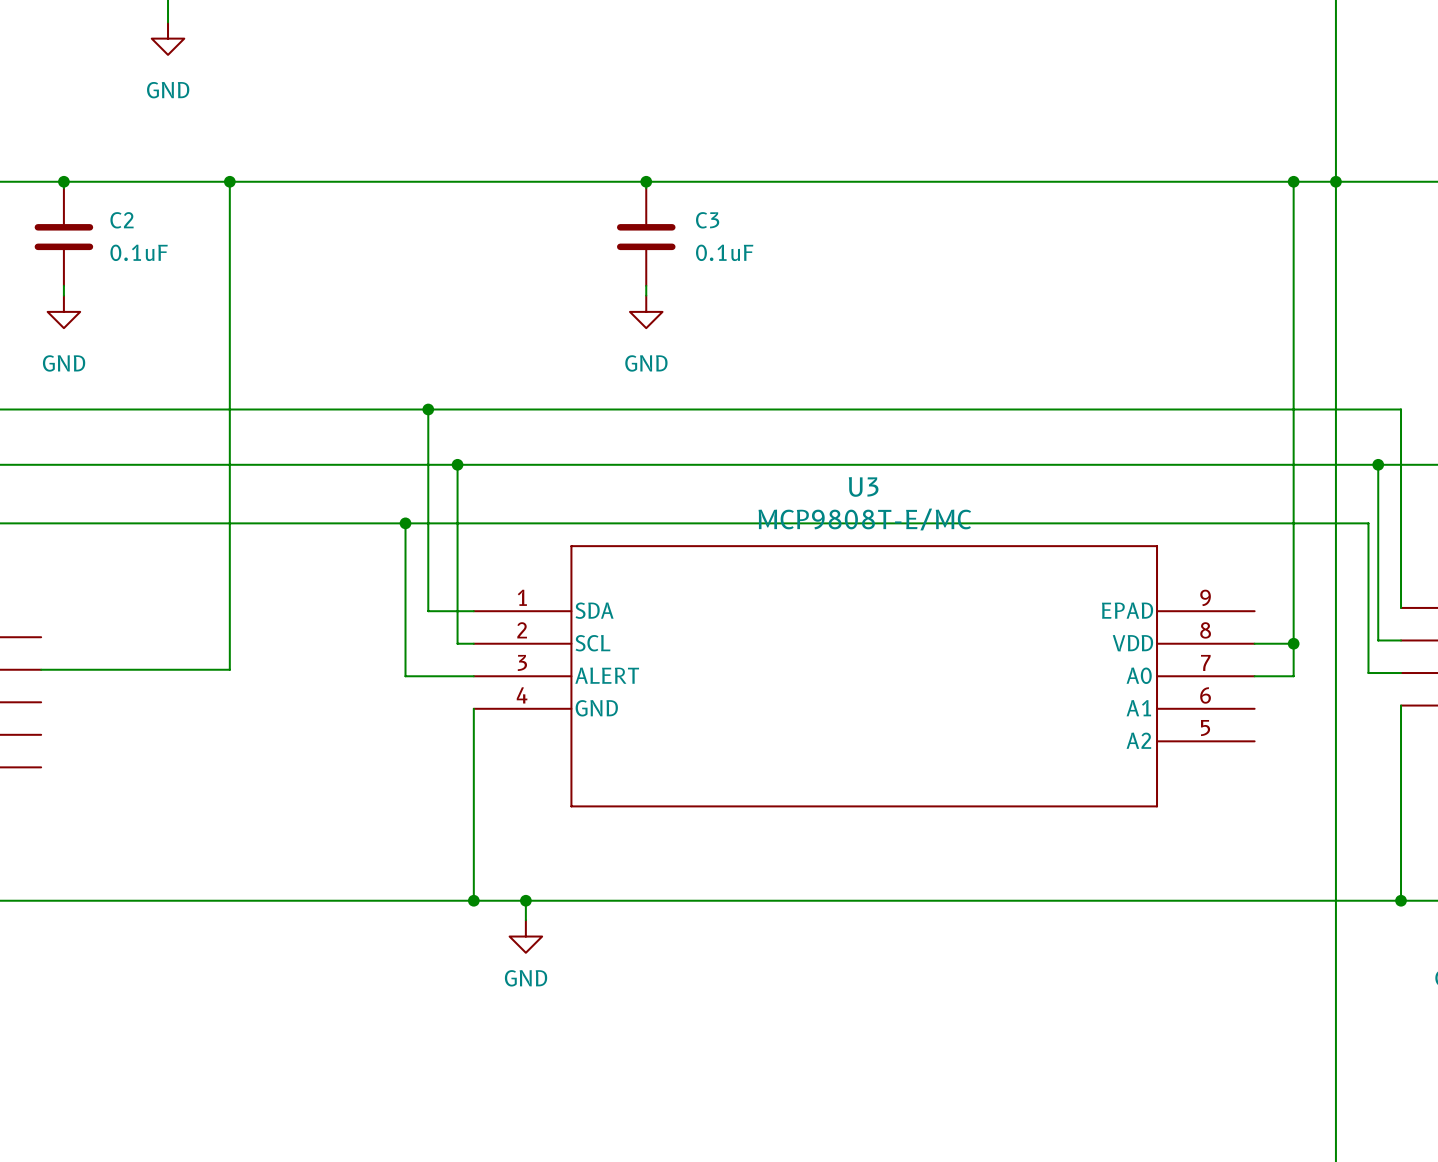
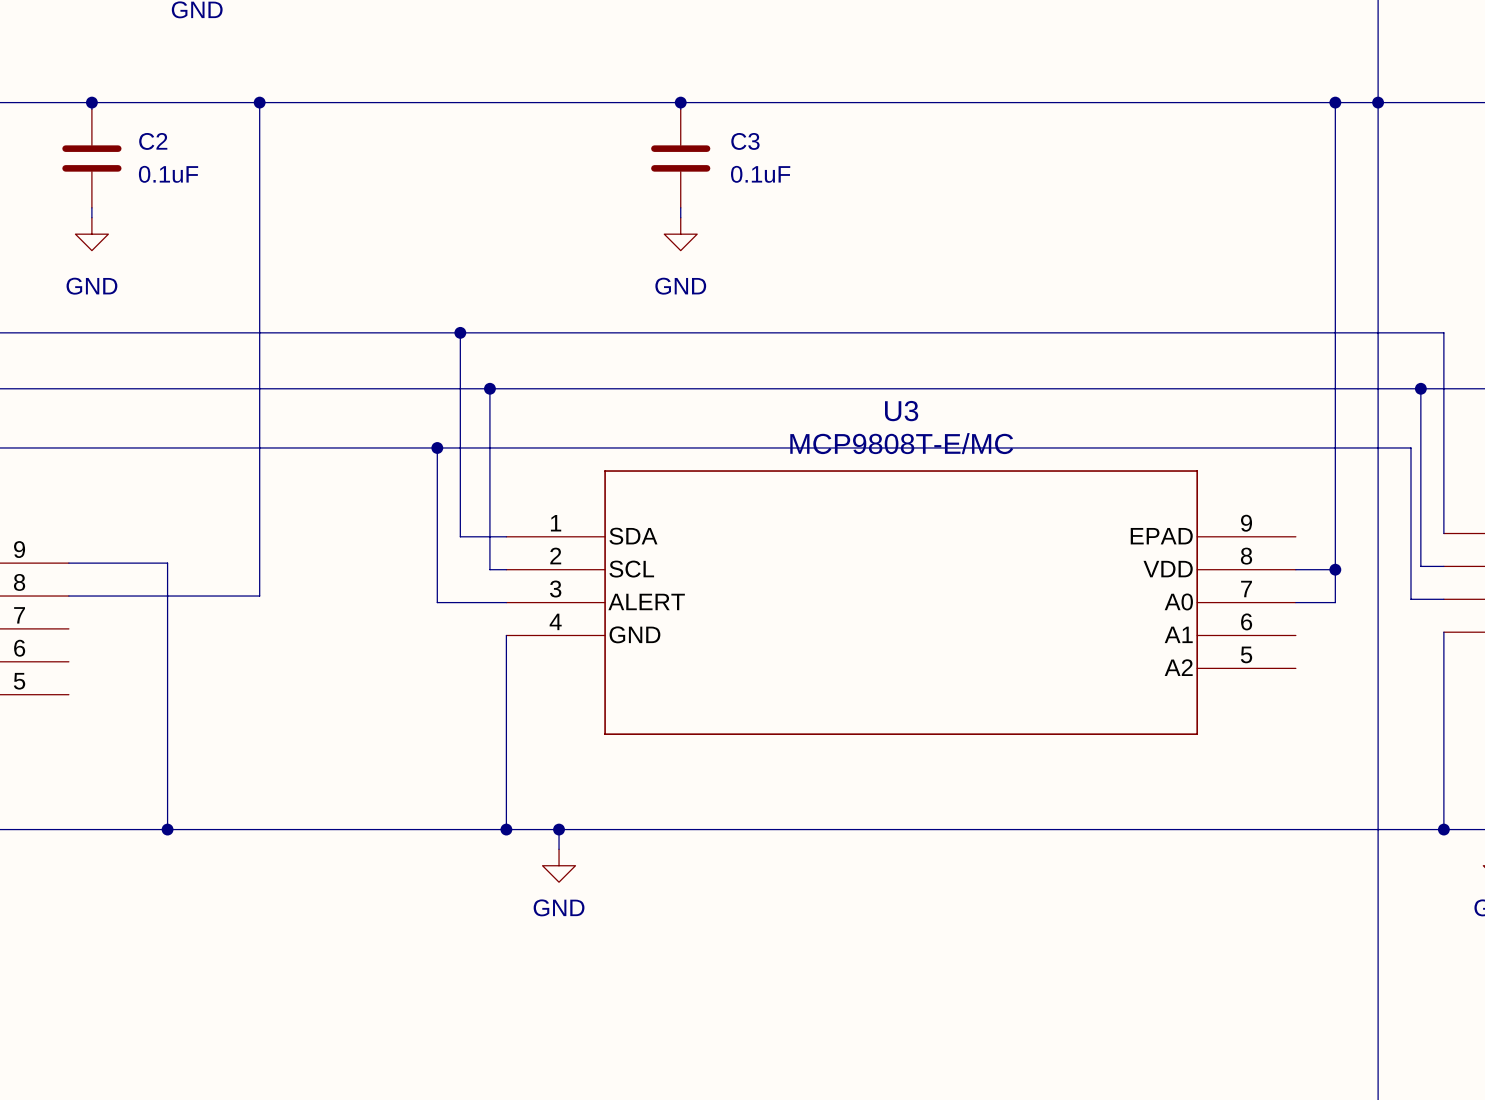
wire: none -> (68, 563) (167, 563) (167, 829)
junction: none -> (167, 829)

